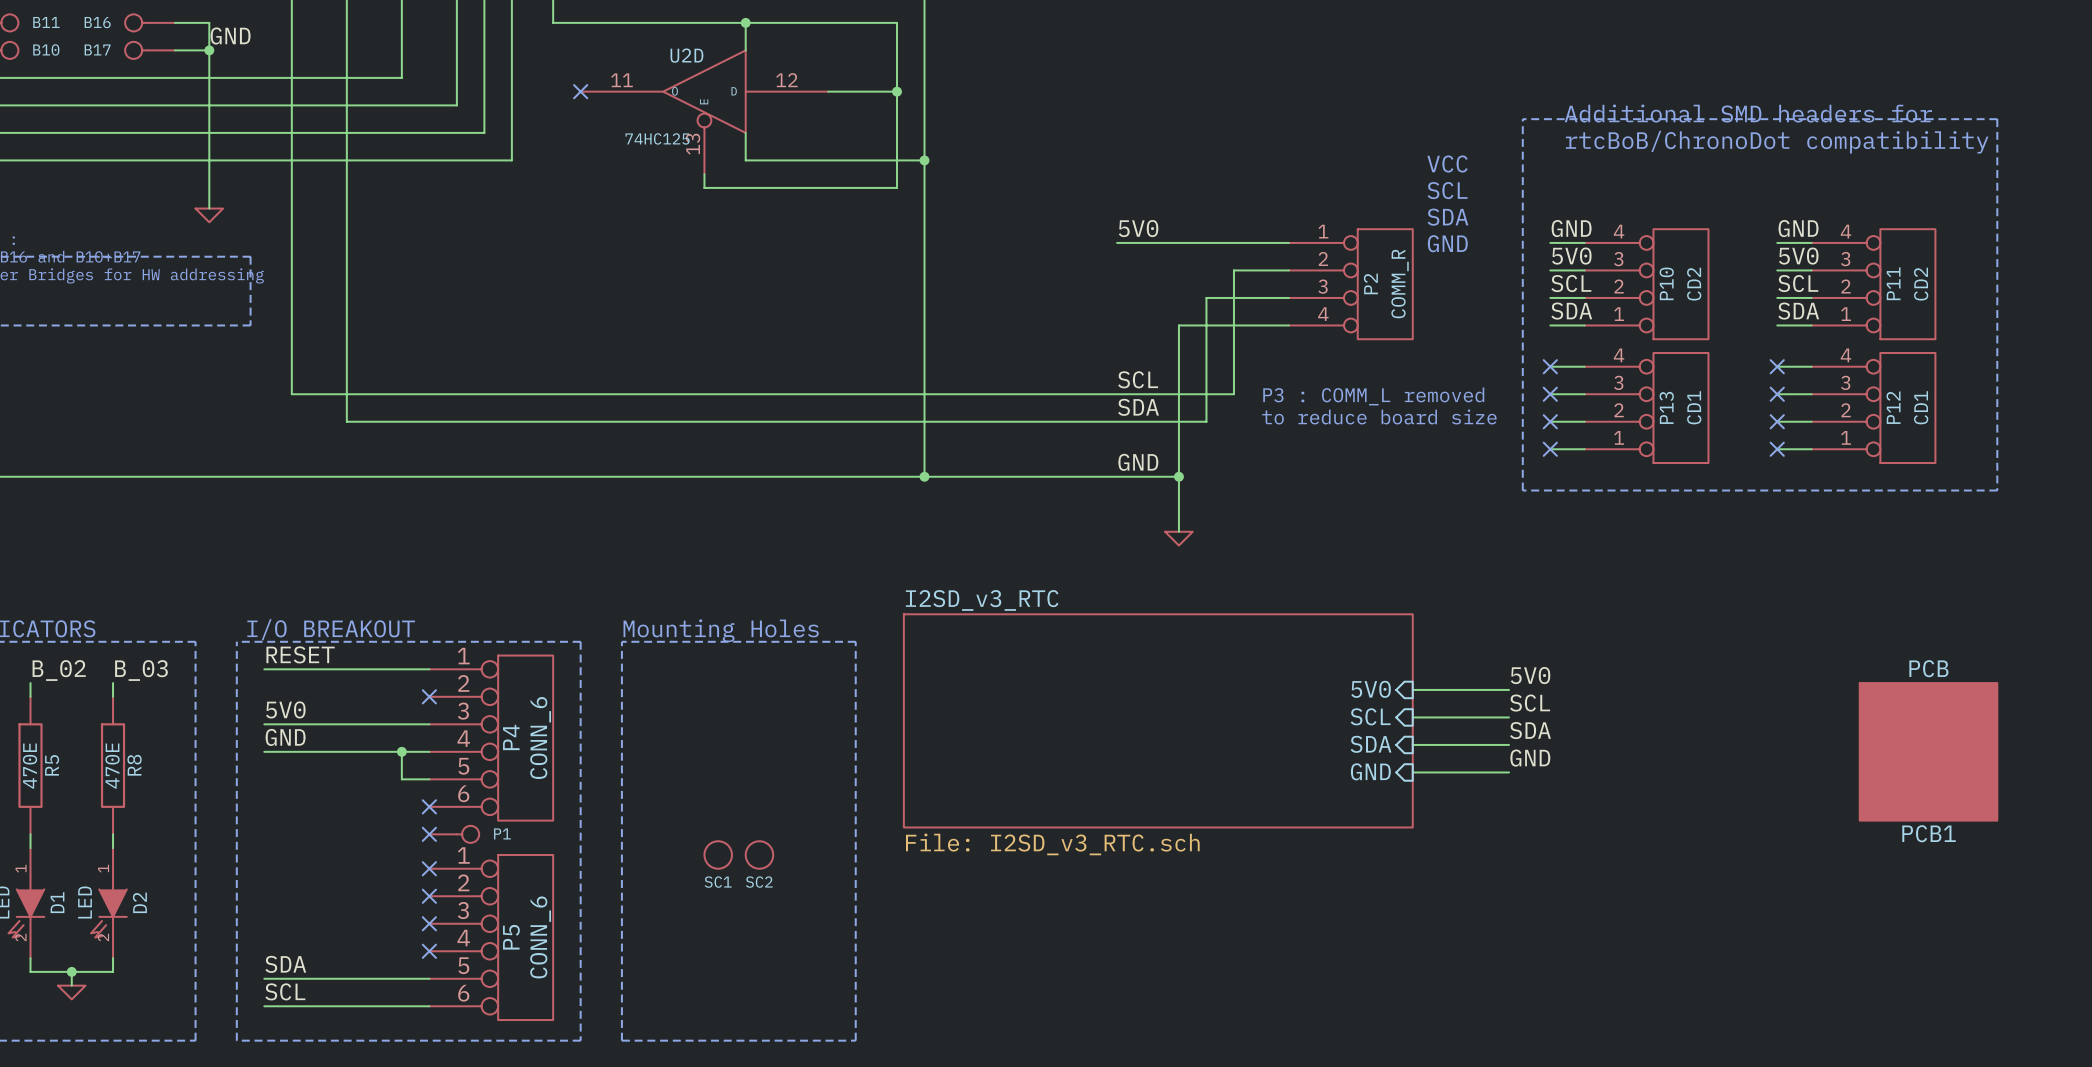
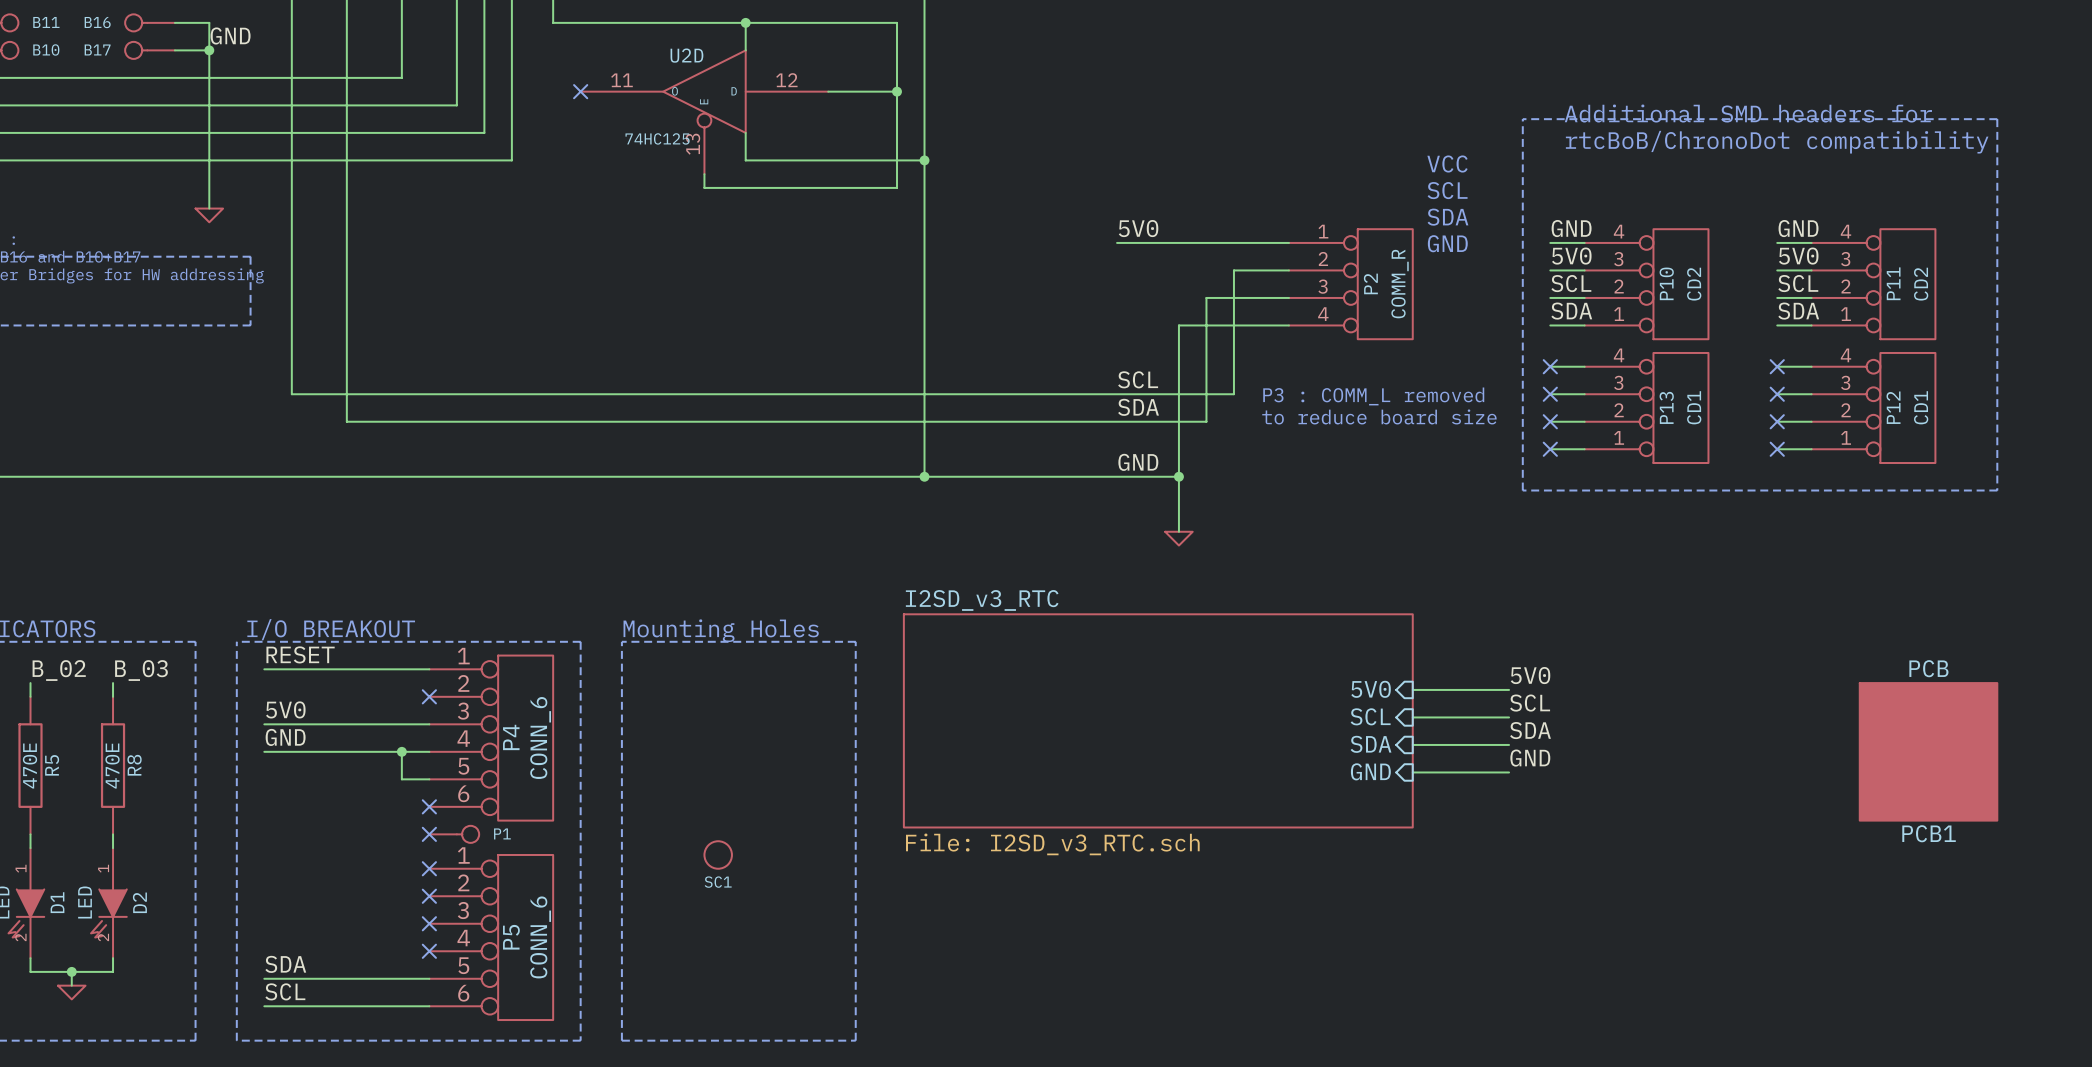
SC2: (759, 854) -> none

